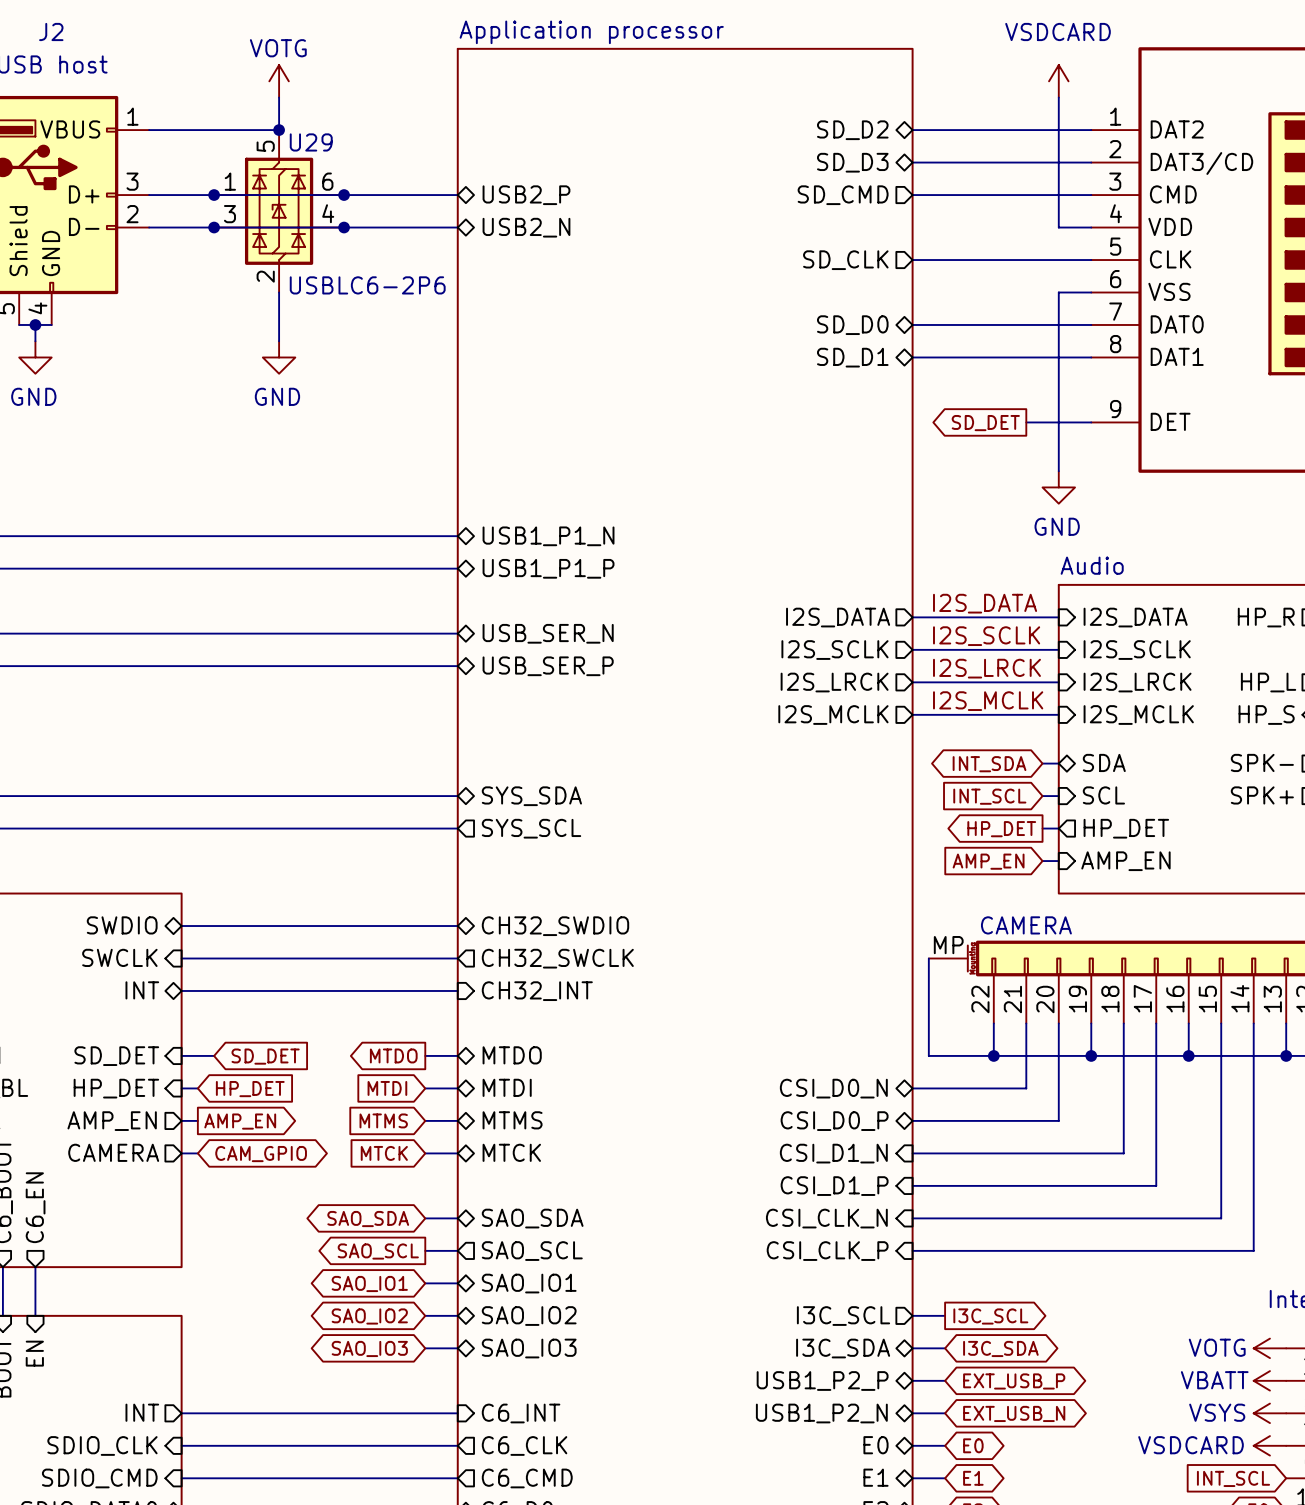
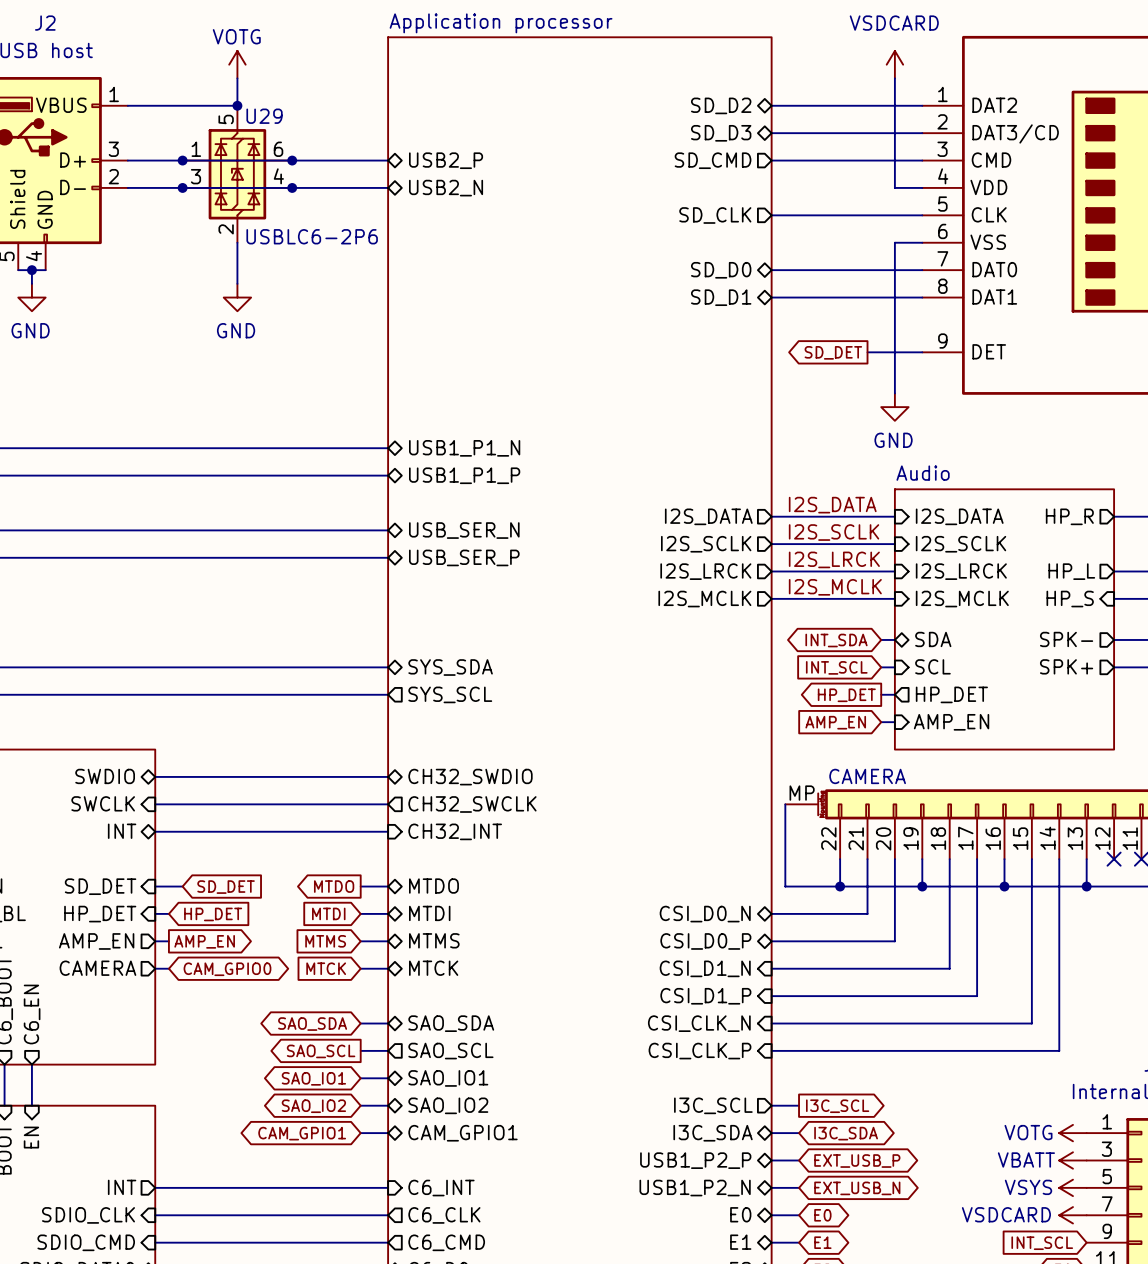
global label: CAM_GPIO (261, 1154) -> CAM_GPIO0 (227, 969)
global label: SAO_IO3 (369, 1348) -> CAM_GPIO1 (302, 1133)
sheet pin: SAO_IO3 (529, 1348) -> CAM_GPIO1 (462, 1133)

